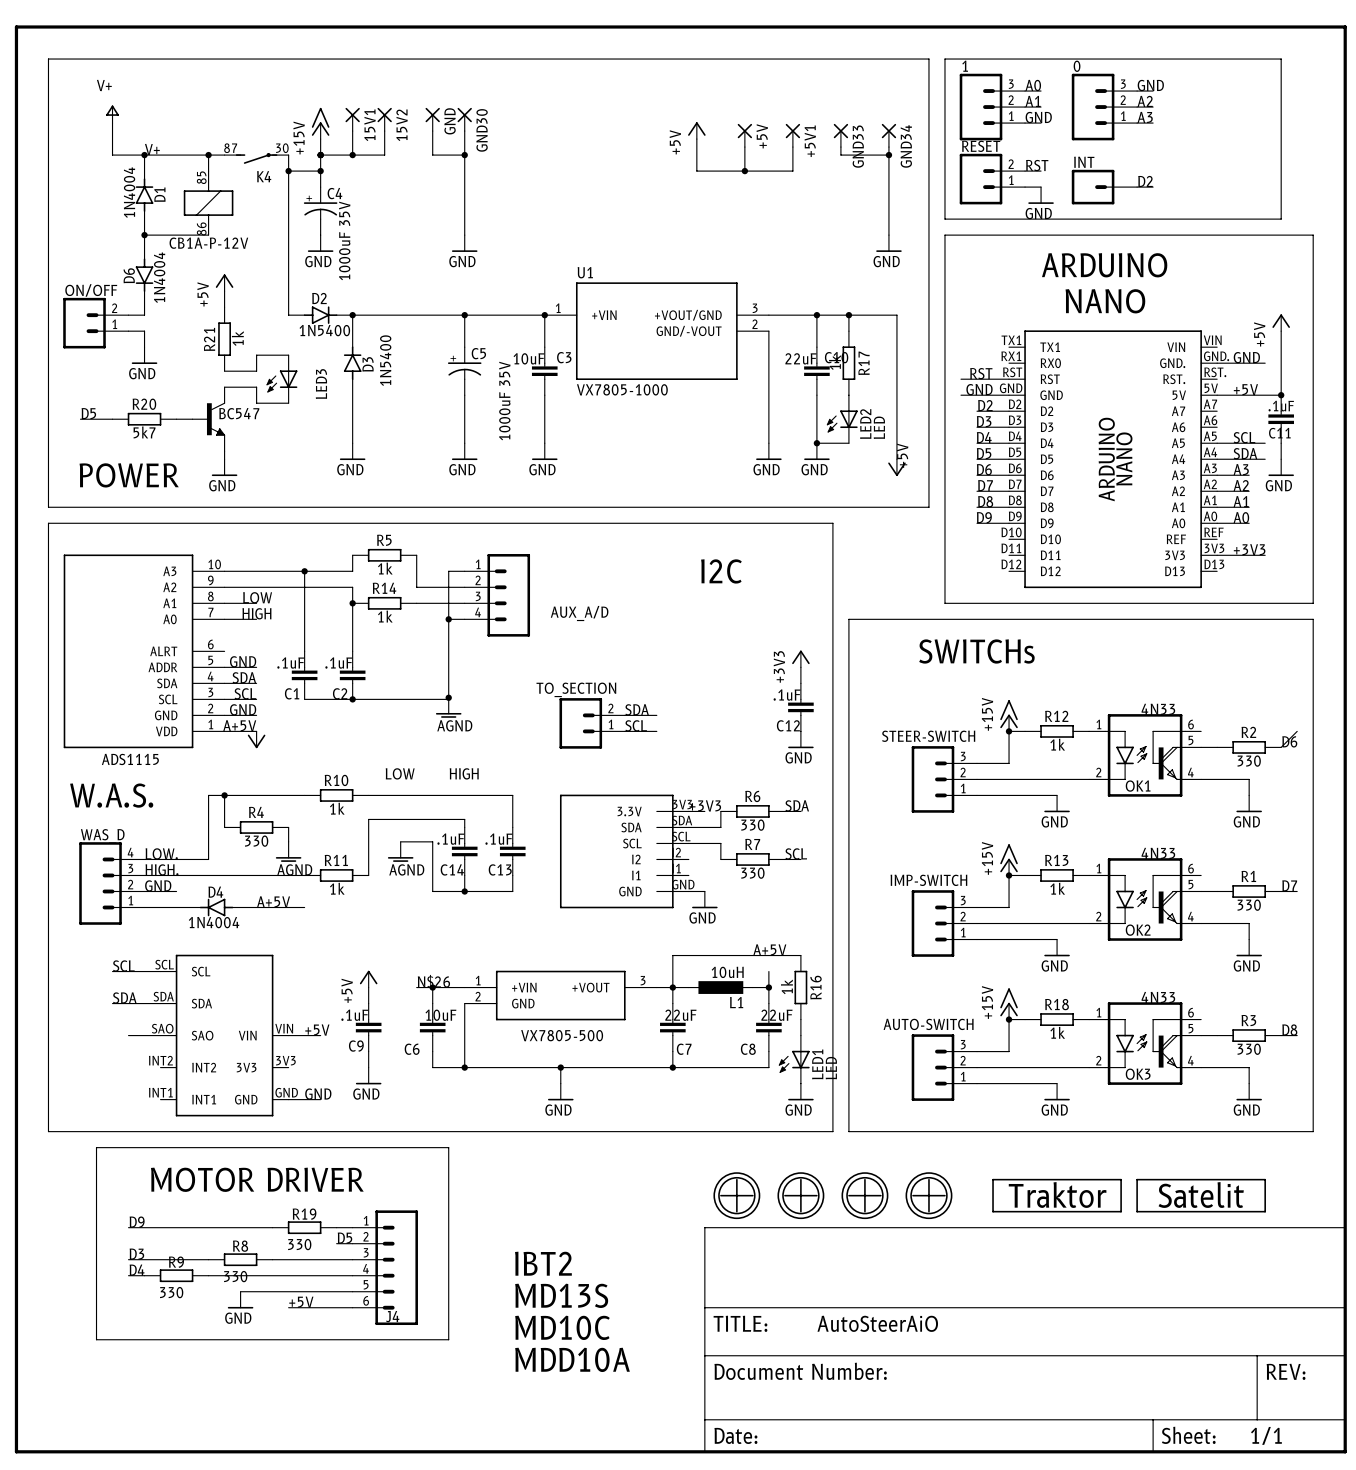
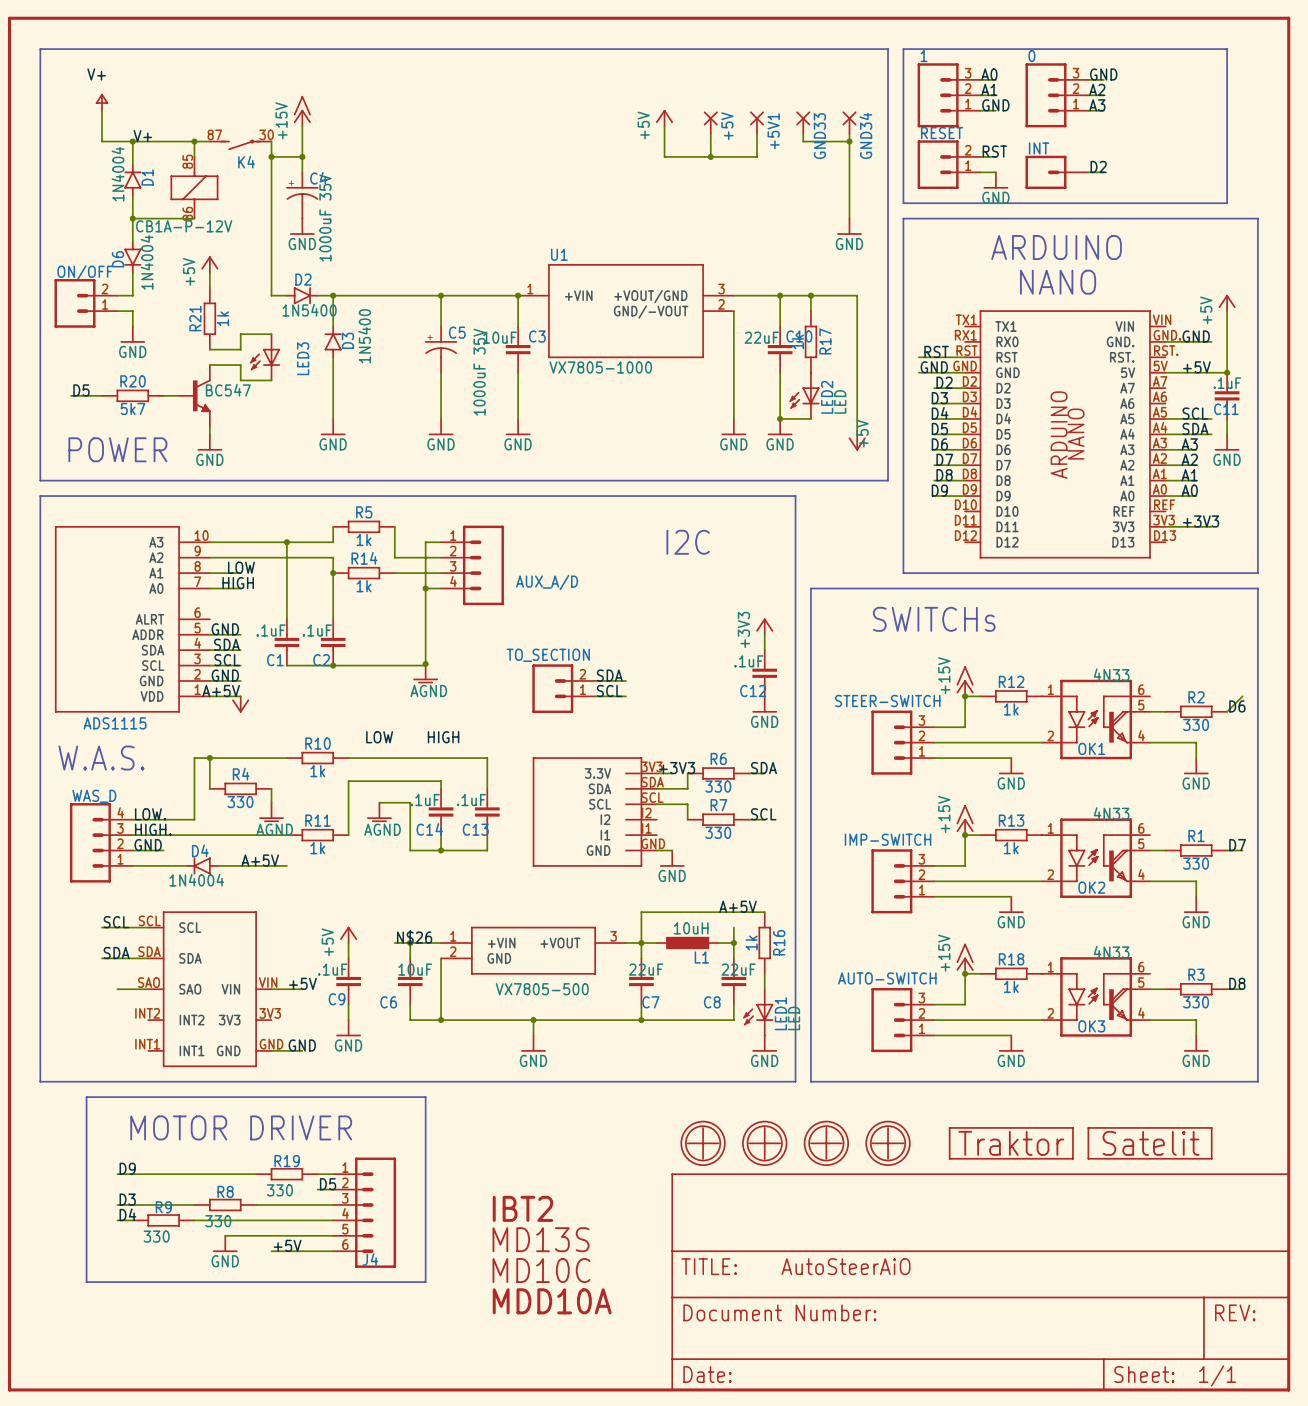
15V1: (352, 119) -> none
15V2: (384, 119) -> none
GND: (432, 119) -> none
GND30: (464, 119) -> none
wire: (352, 131) (352, 155) -> none
wire: (384, 131) (384, 155) (320, 155) -> none
wire: (432, 131) (432, 155) (464, 155) -> none
wire: (464, 131) (464, 235) -> none
junction: (320, 155) -> none
junction: (352, 155) -> none
junction: (464, 155) -> none
power symbol: GND (464, 243) -> none

